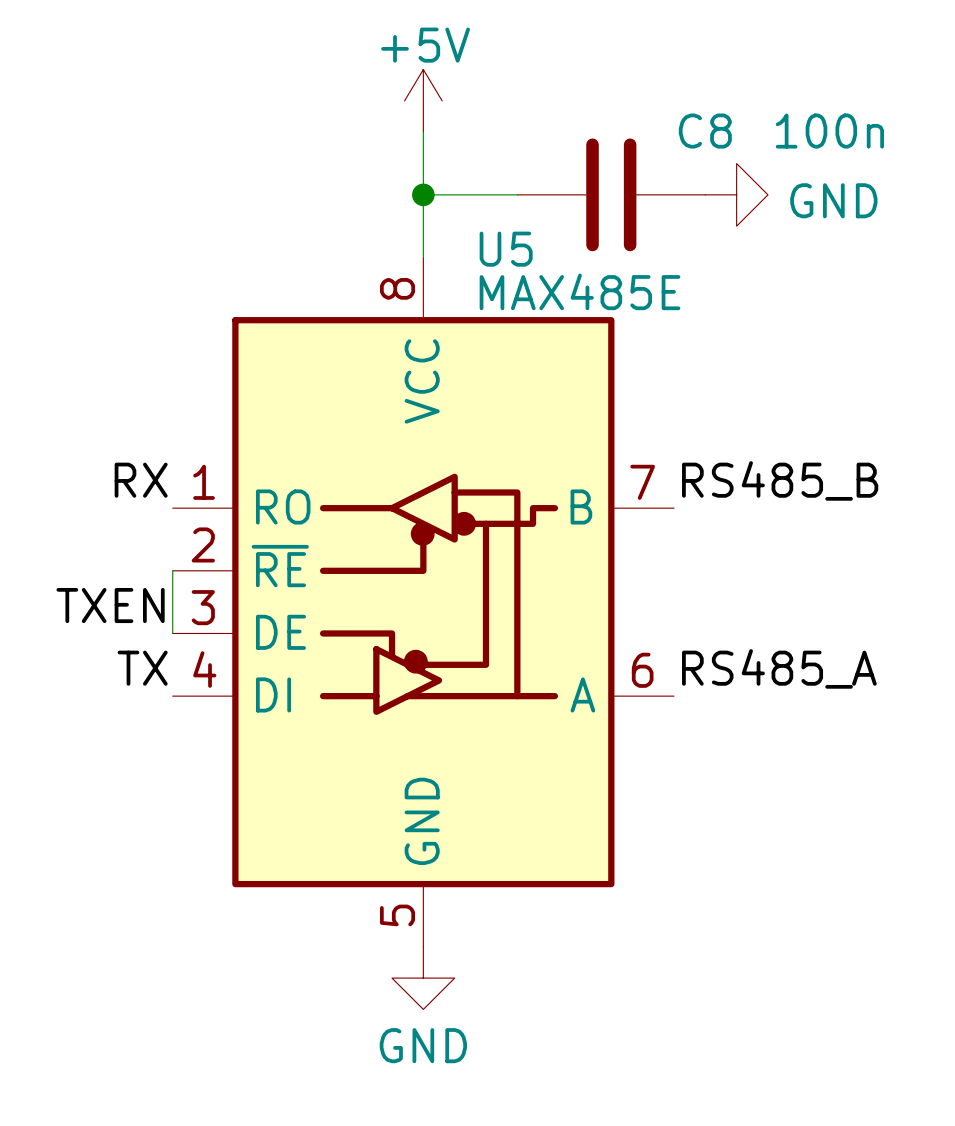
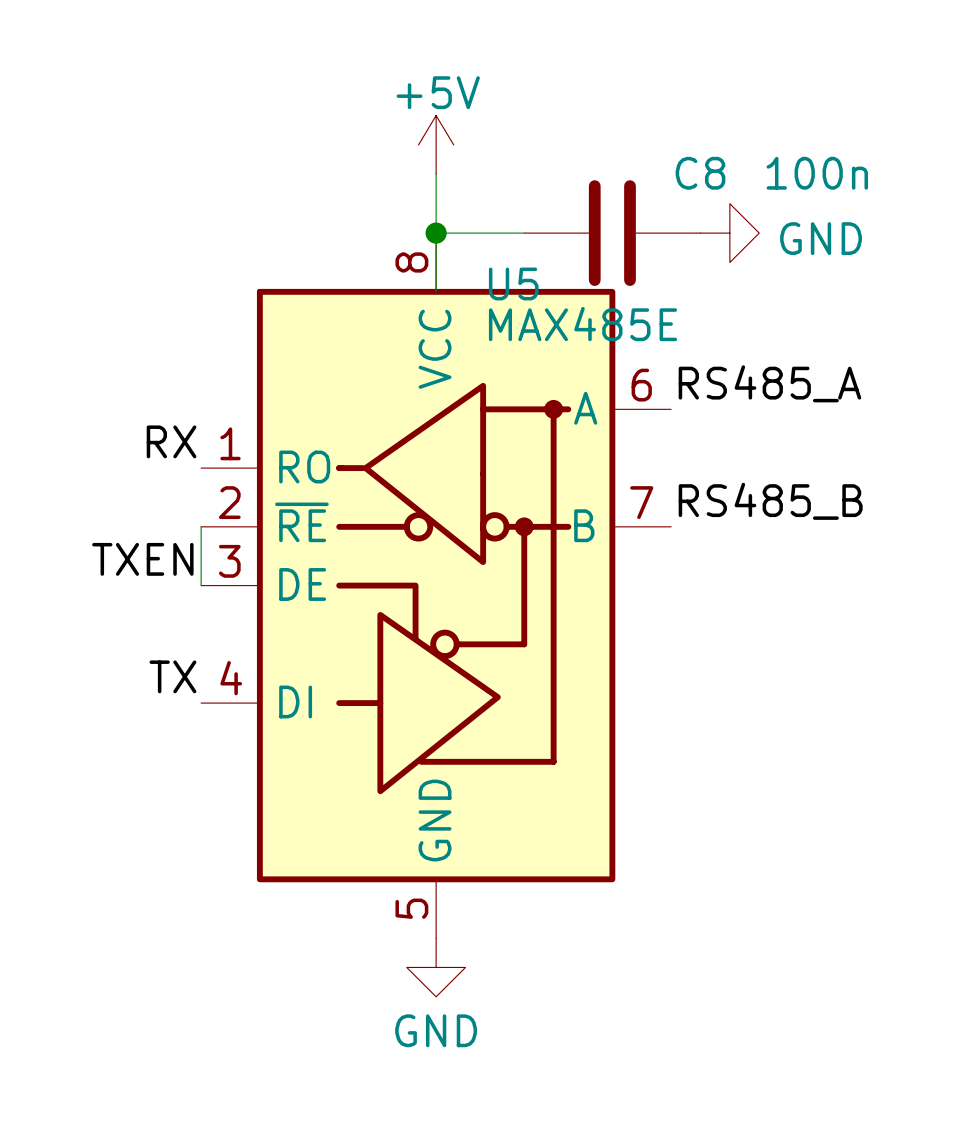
U5 symbol: [172, 257, 674, 947] -> [201, 233, 672, 939]
label position: RX (141, 480) -> RX (171, 441)
wire: (172, 570) (172, 633) -> (201, 585) (201, 526)
label position: TXEN (110, 605) -> TXEN (142, 559)
label position: RS485_A (779, 668) -> RS485_A (769, 383)

